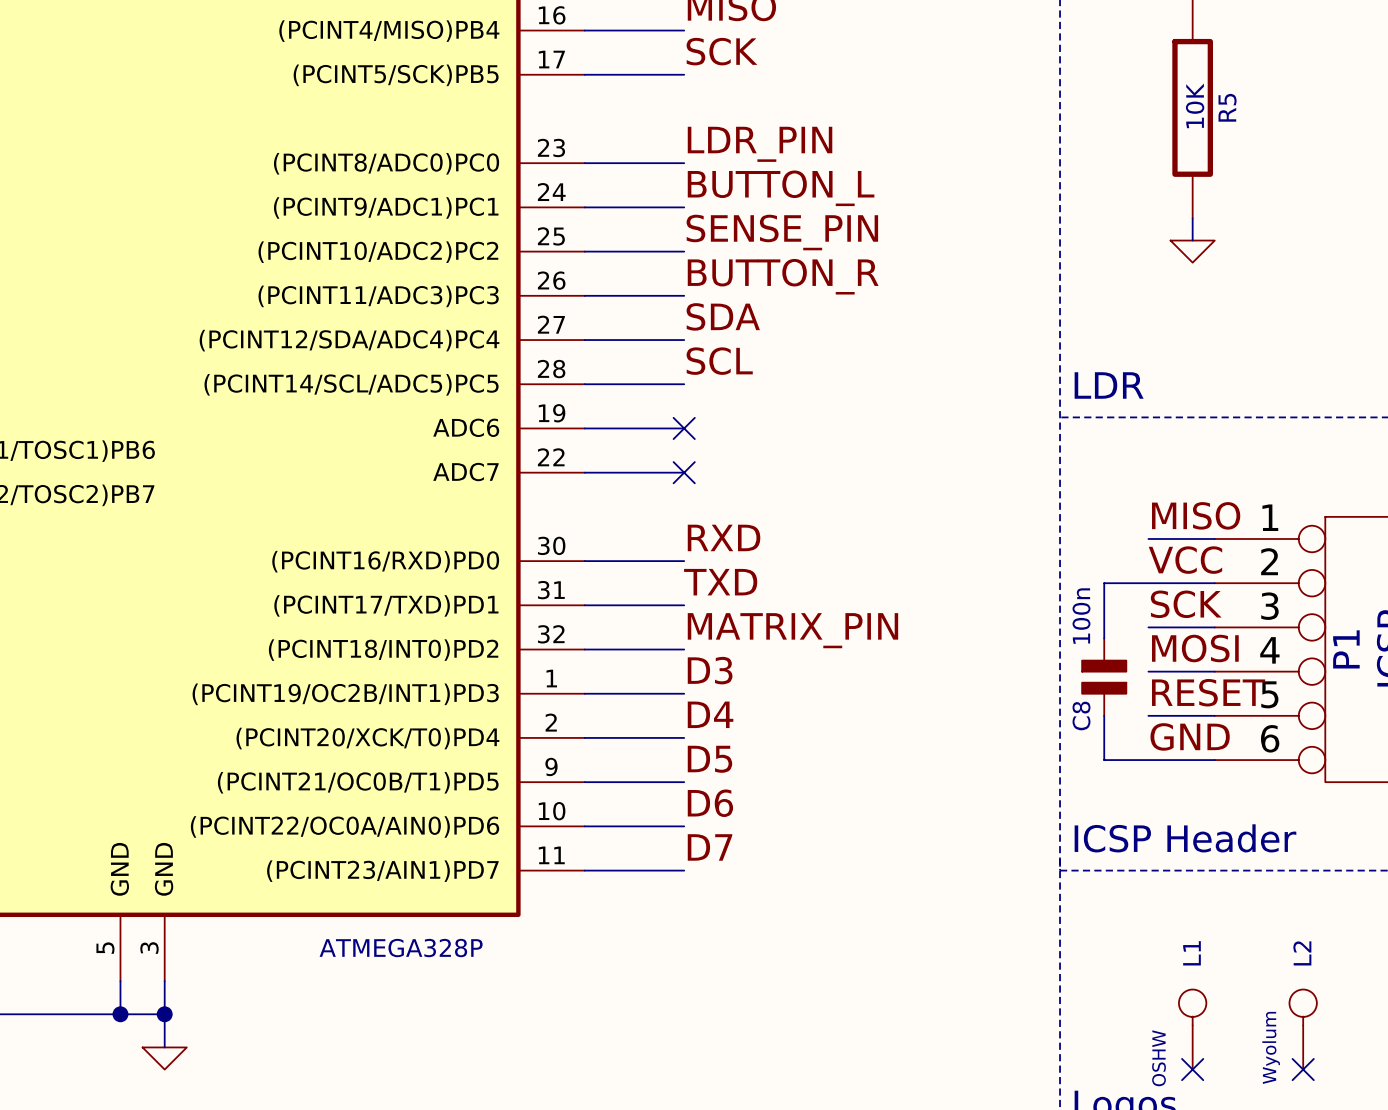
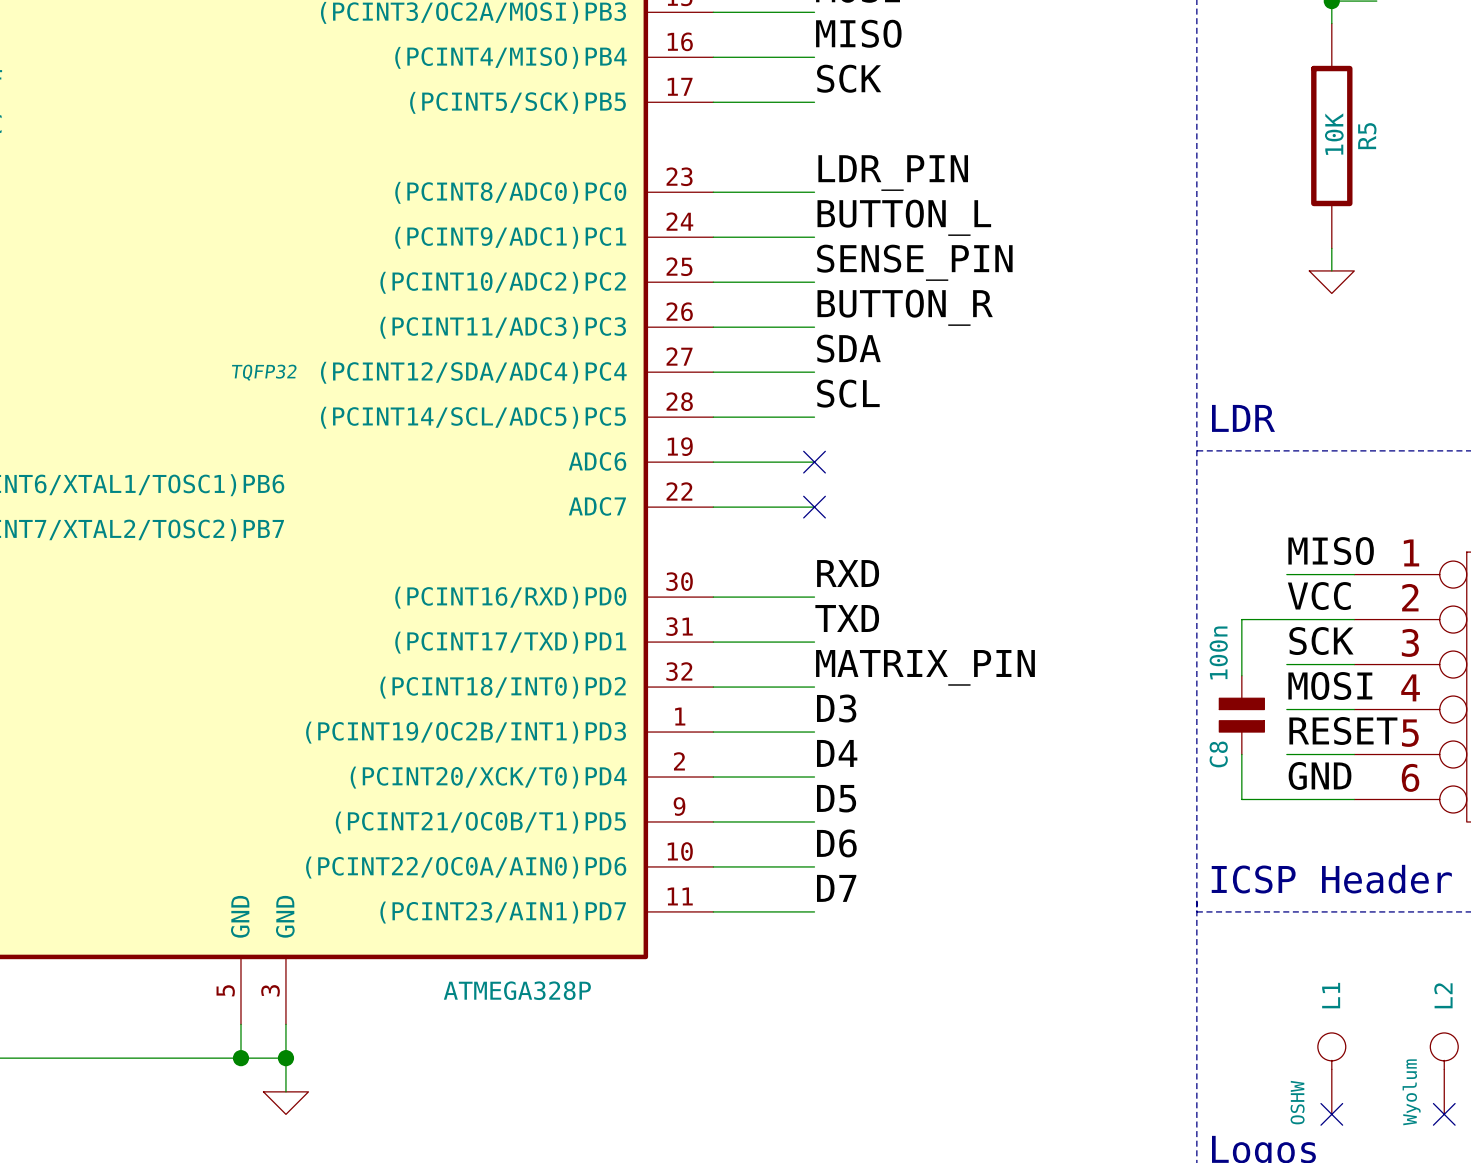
part text: none -> TQFP32 (264, 372)

